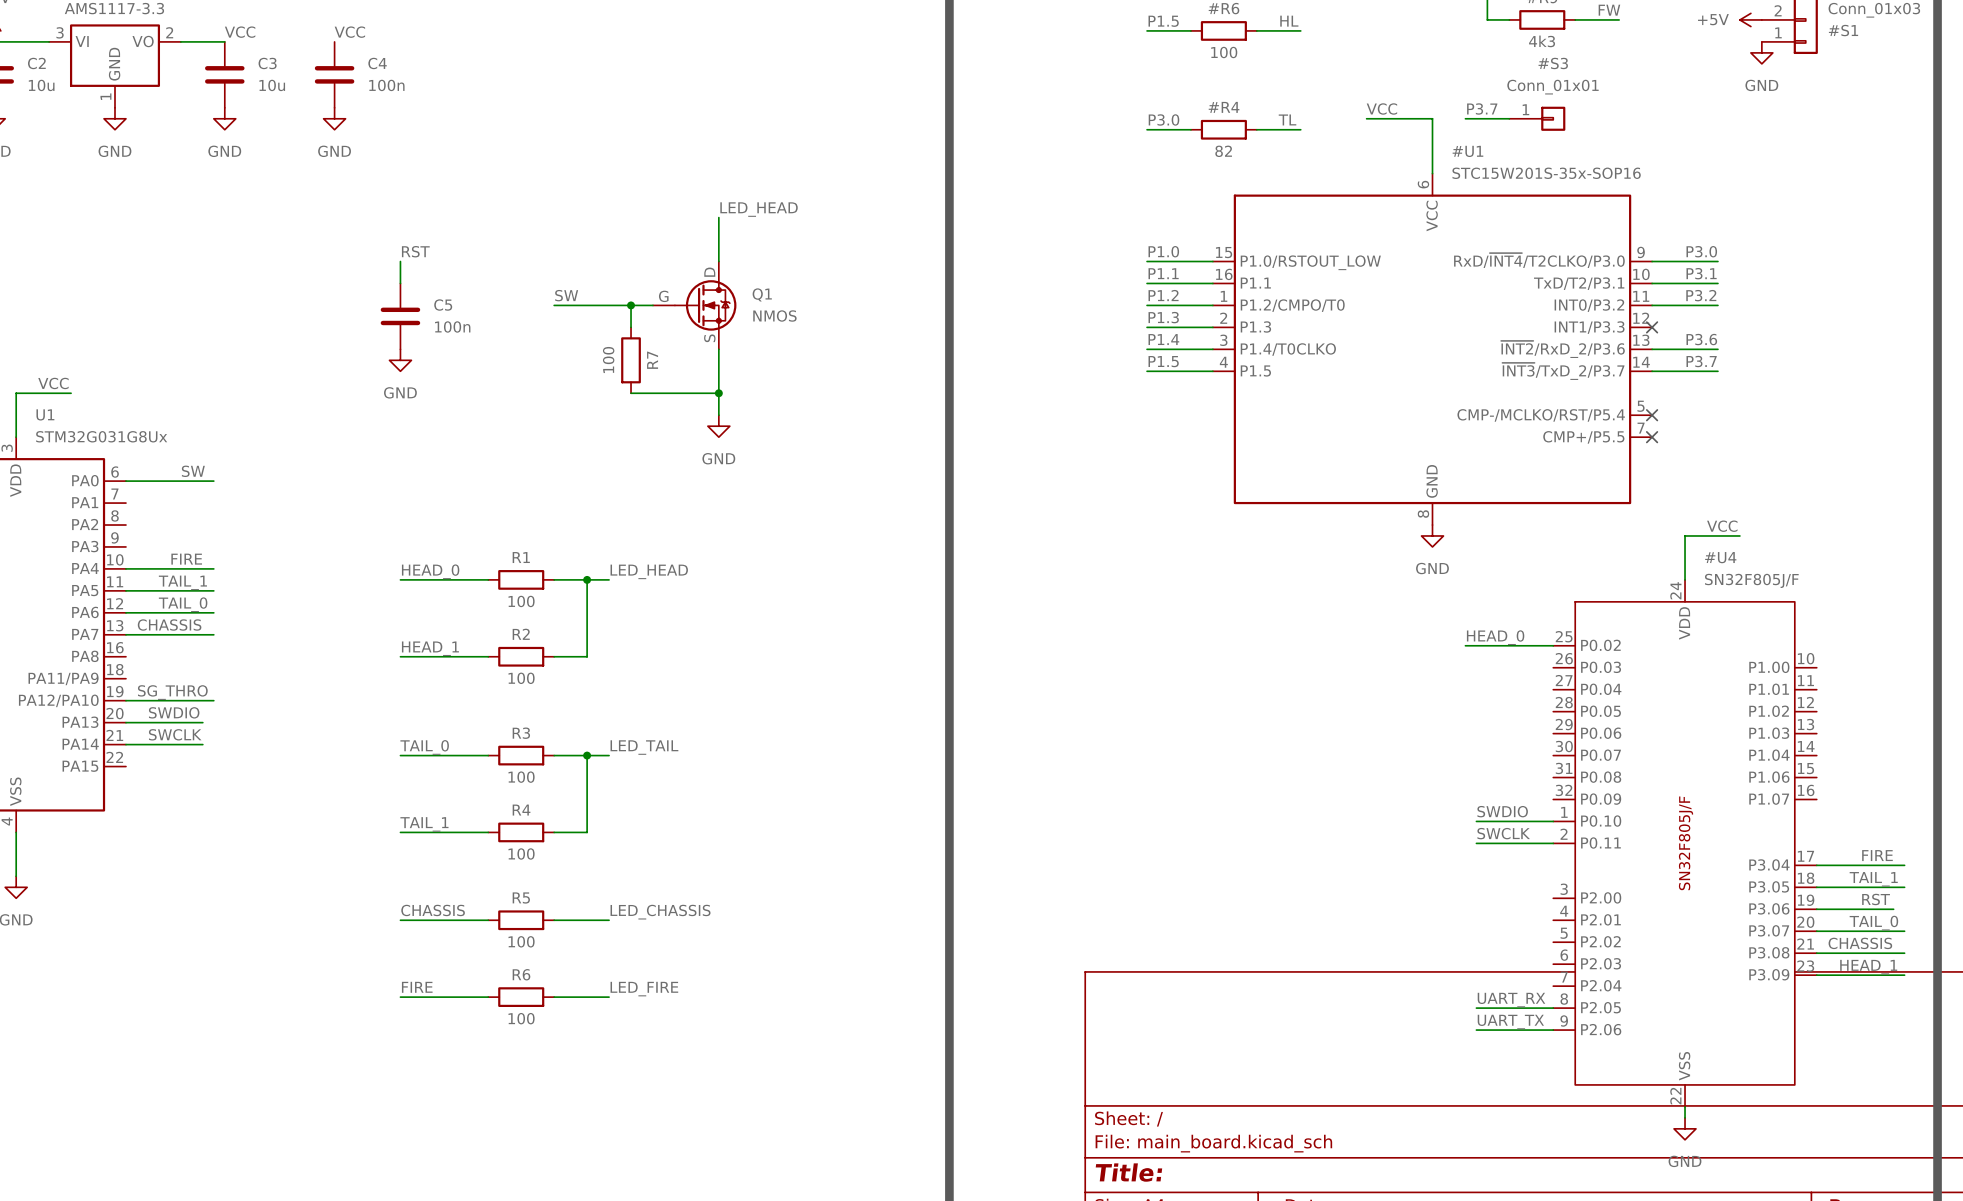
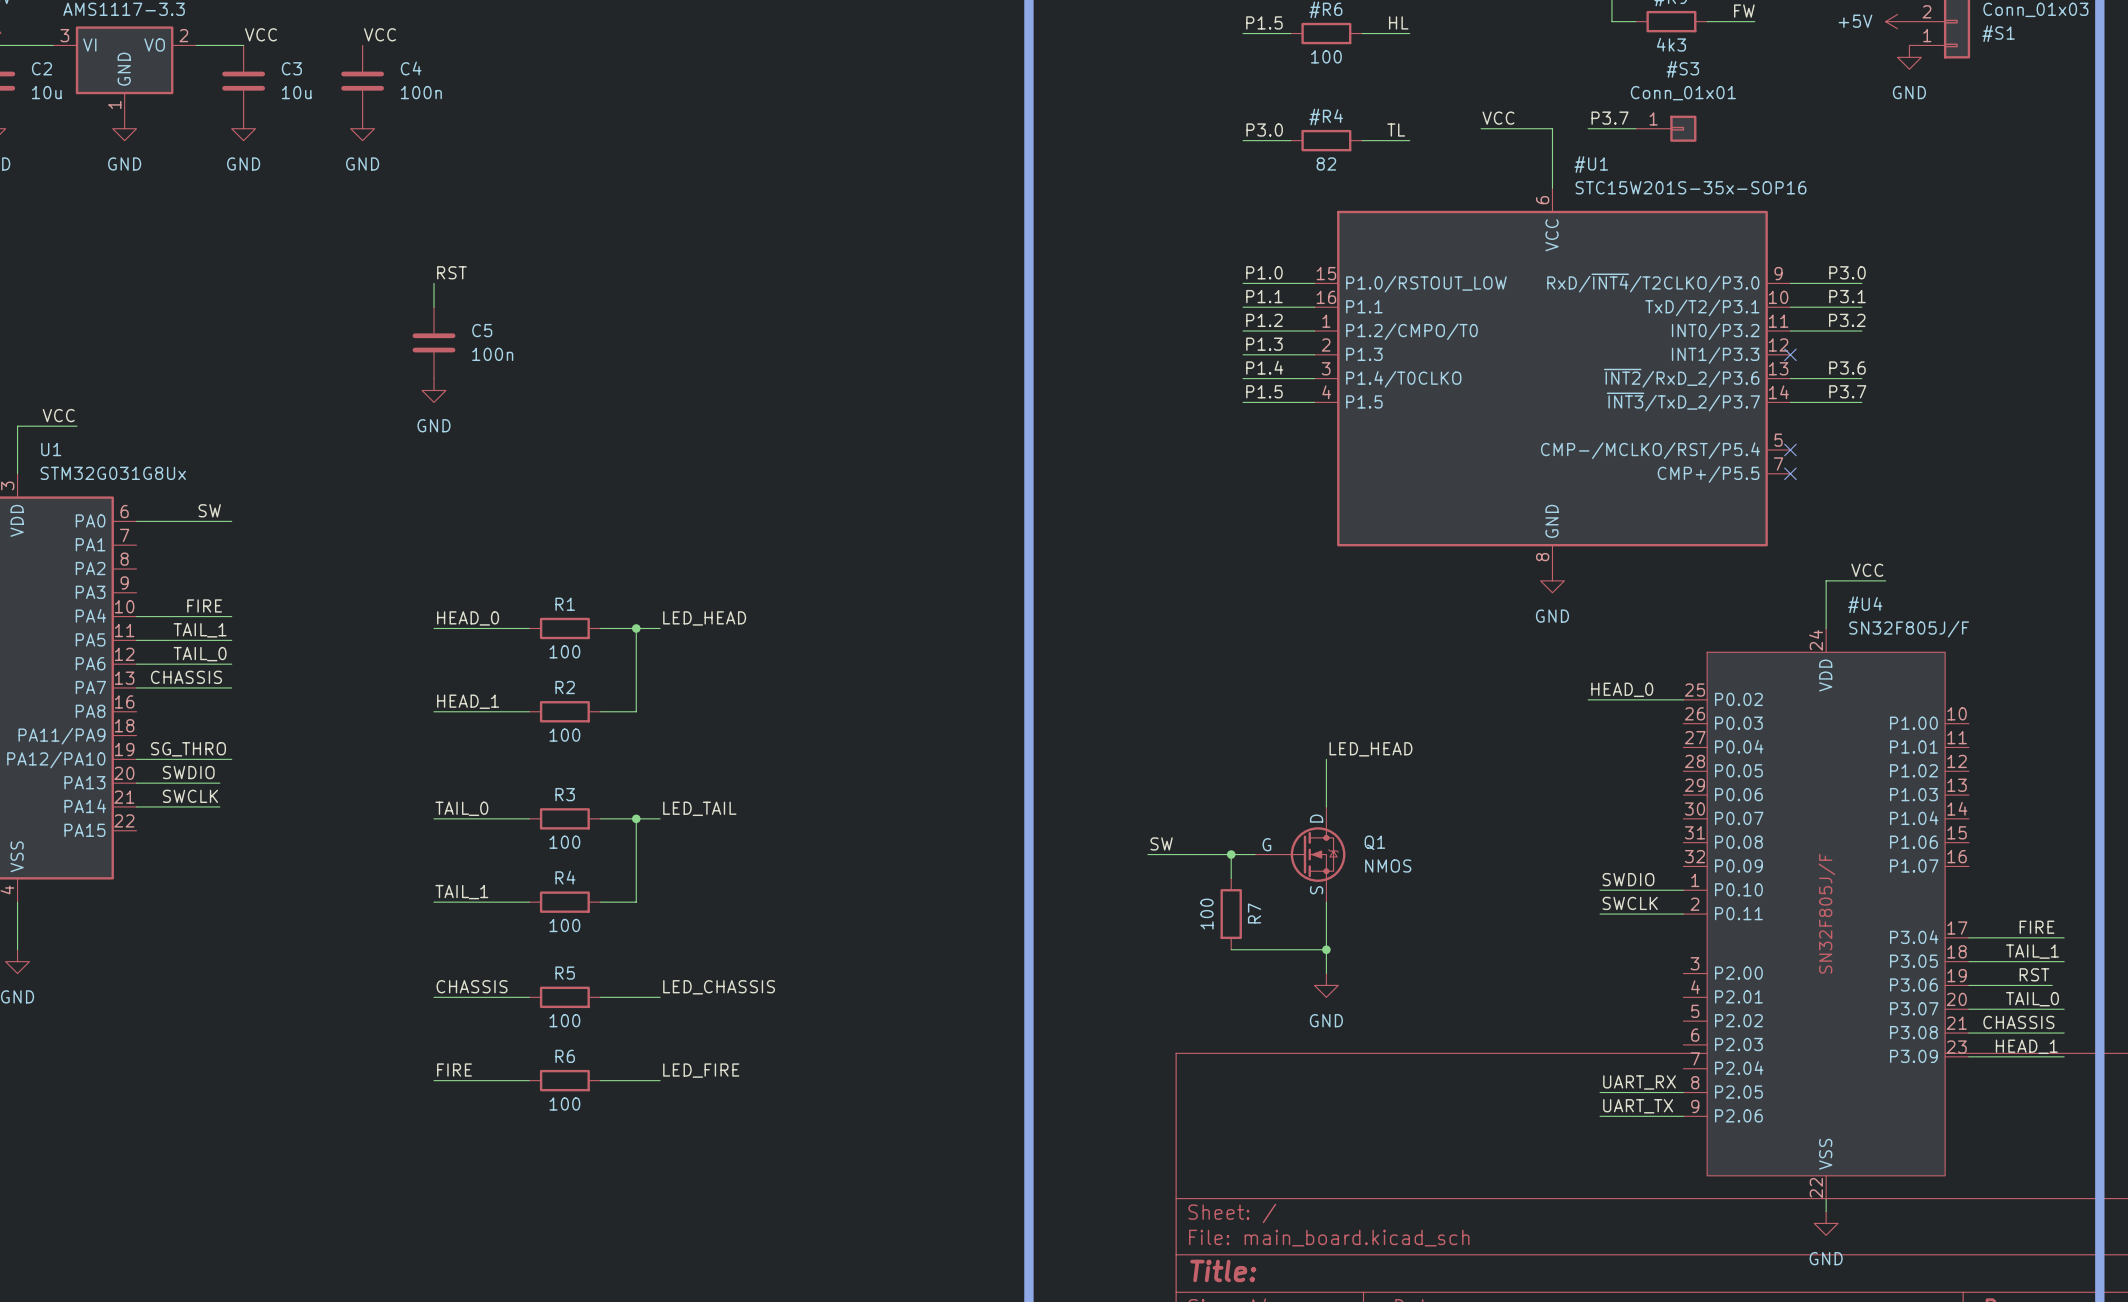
label: LED_HEAD (759, 209) -> none
wire: (718, 217) (718, 261) -> none
label: SW (566, 295) -> none
wire: (554, 305) (652, 305) -> none
wire: (631, 305) (631, 327) -> none
junction: (631, 305) -> none
Q1 position: (694, 305) -> (1300, 854)
wire: (718, 349) (718, 415) -> none
R7 position: (631, 360) -> (1231, 914)
wire: (631, 393) (718, 393) -> none
junction: (718, 393) -> none
power symbol: GND (718, 426) -> none
label: none -> LED_HEAD (1370, 749)
wire: none -> (1326, 759) (1326, 806)
label: none -> SW (1161, 843)
wire: none -> (1147, 854) (1255, 854)
wire: none -> (1231, 854) (1231, 878)
junction: none -> (1231, 854)
wire: none -> (1326, 902) (1326, 973)
wire: none -> (1231, 949) (1326, 949)
junction: none -> (1326, 949)
power symbol: none -> GND (1326, 985)

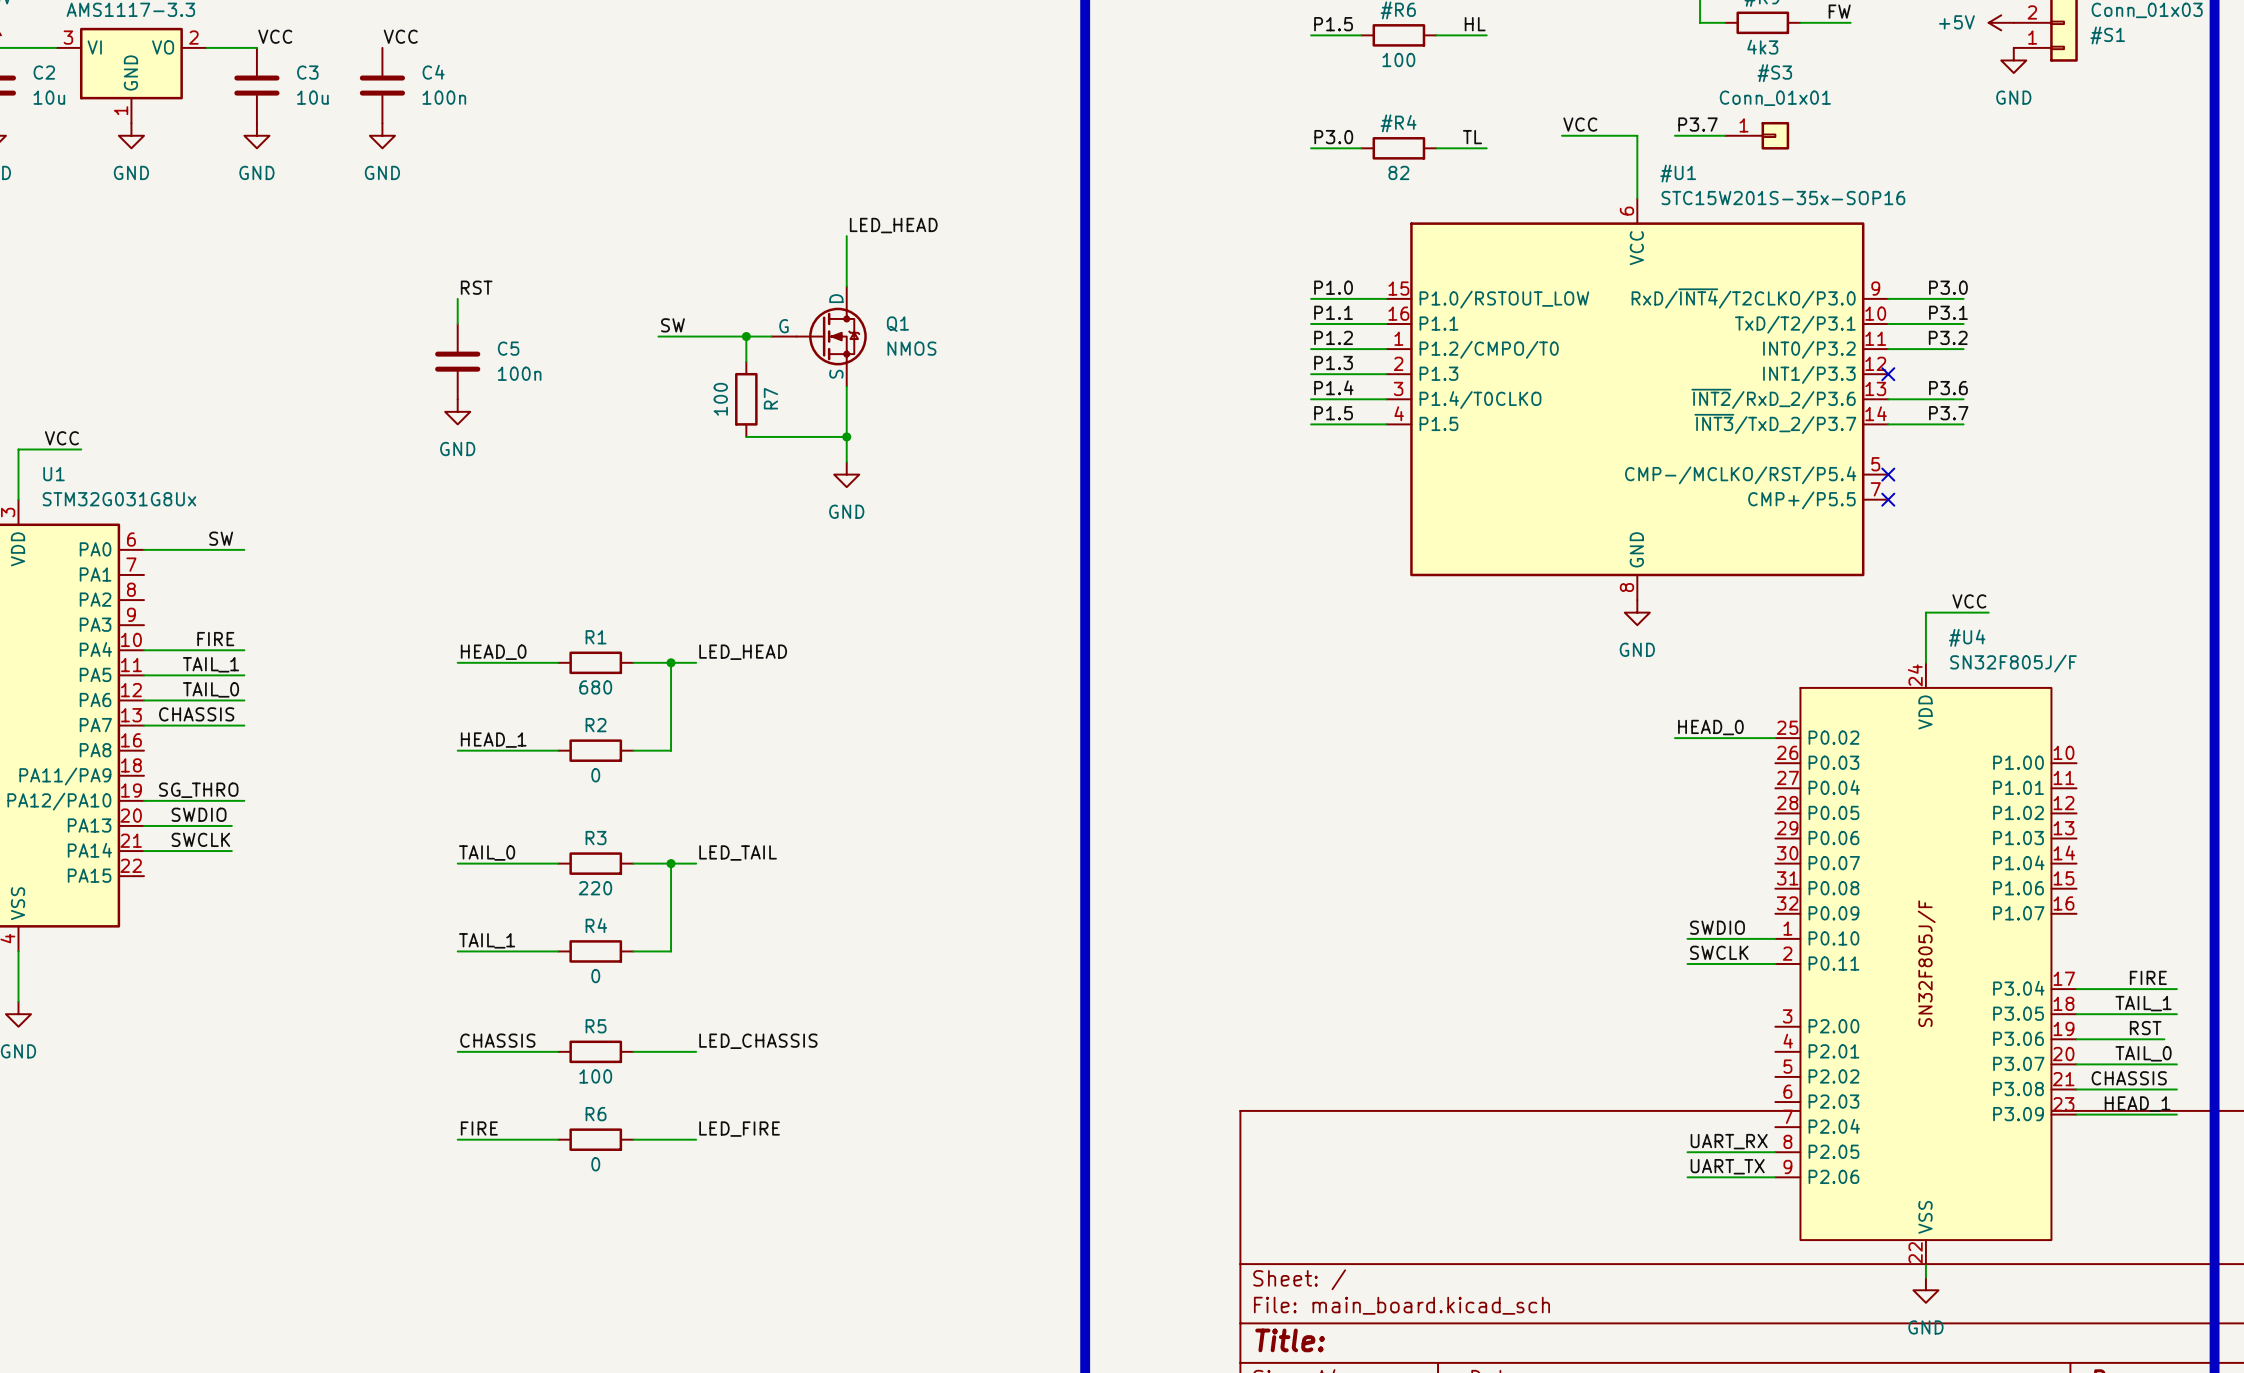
label: none -> LED_HEAD (893, 225)
wire: none -> (846, 236) (846, 286)
label: none -> SW (672, 325)
wire: none -> (658, 336) (771, 336)
wire: none -> (746, 336) (746, 361)
junction: none -> (746, 336)
wire: none -> (846, 386) (846, 462)
wire: none -> (746, 436) (846, 436)
junction: none -> (846, 436)
power symbol: none -> GND (846, 474)
R1 value: 100 (564, 651) -> 680 (595, 687)
R2 value: 100 (564, 735) -> 0 (595, 775)
label: LED_HEAD (1370, 749) -> none
wire: (1326, 759) (1326, 806) -> none
R3 value: 100 (564, 842) -> 220 (595, 888)
label: SW (1161, 843) -> none
wire: (1147, 854) (1255, 854) -> none
wire: (1231, 854) (1231, 878) -> none
junction: (1231, 854) -> none
Q1 position: (1300, 854) -> (819, 336)
wire: (1326, 902) (1326, 973) -> none
R7 position: (1231, 914) -> (746, 399)
R4 value: 100 (564, 925) -> 0 (595, 976)
wire: (1231, 949) (1326, 949) -> none
junction: (1326, 949) -> none
power symbol: GND (1326, 985) -> none
R6 value: 100 (564, 1103) -> 0 (595, 1164)

